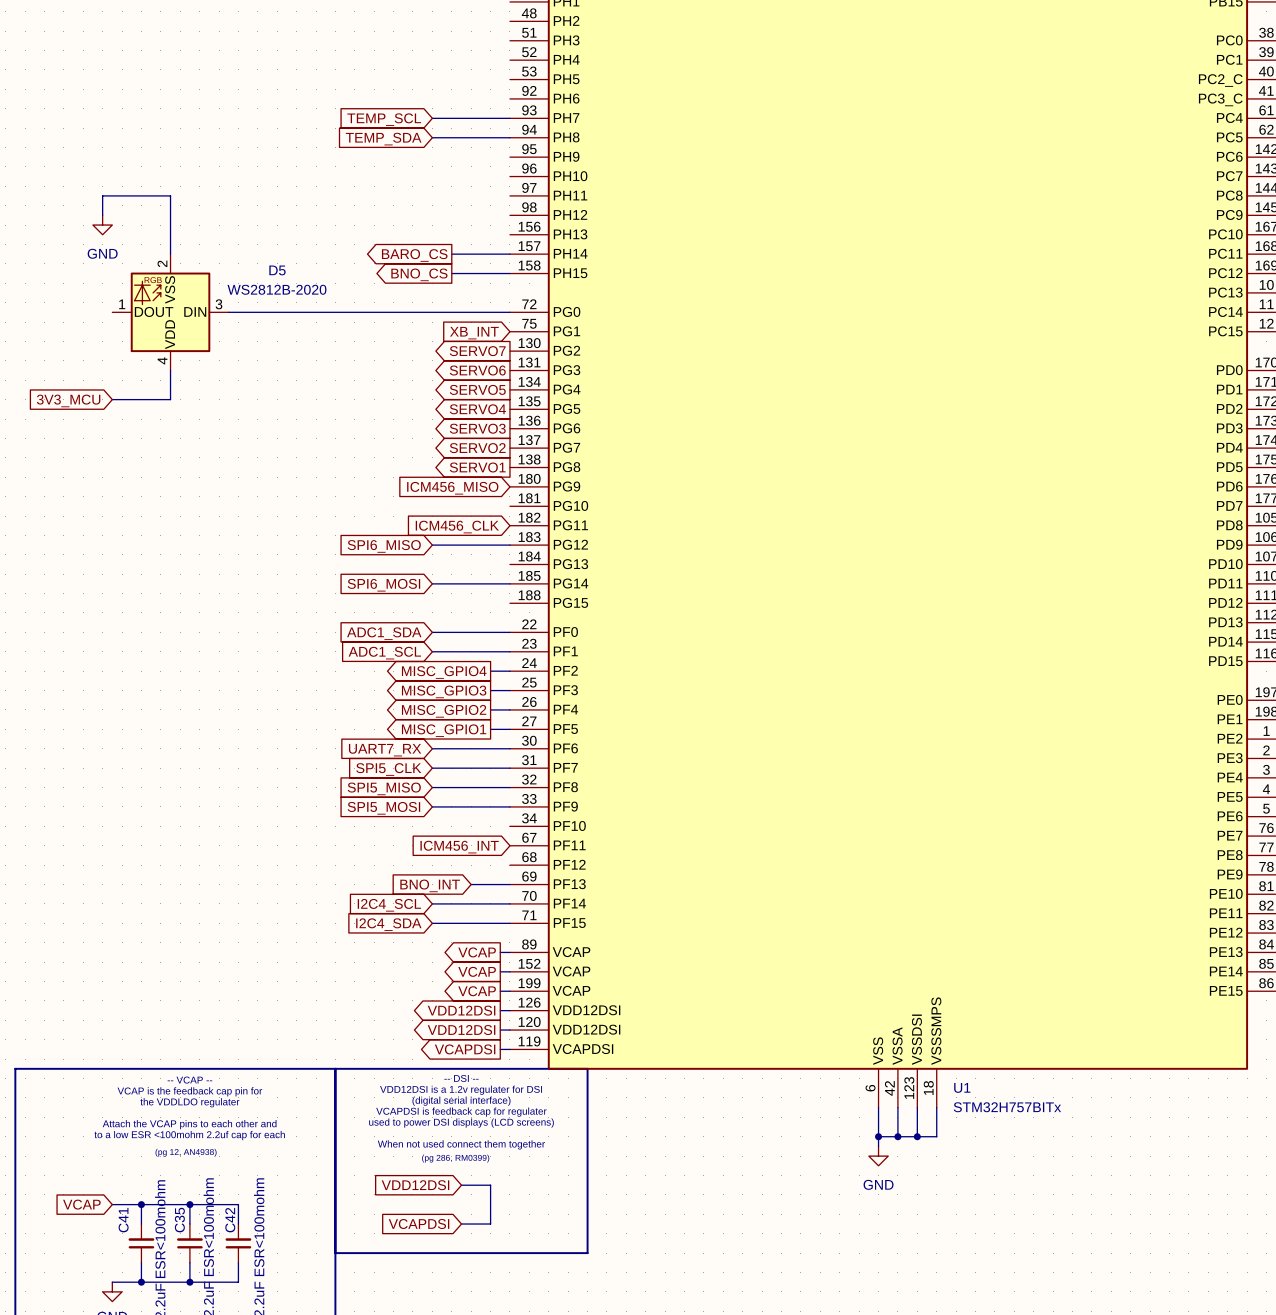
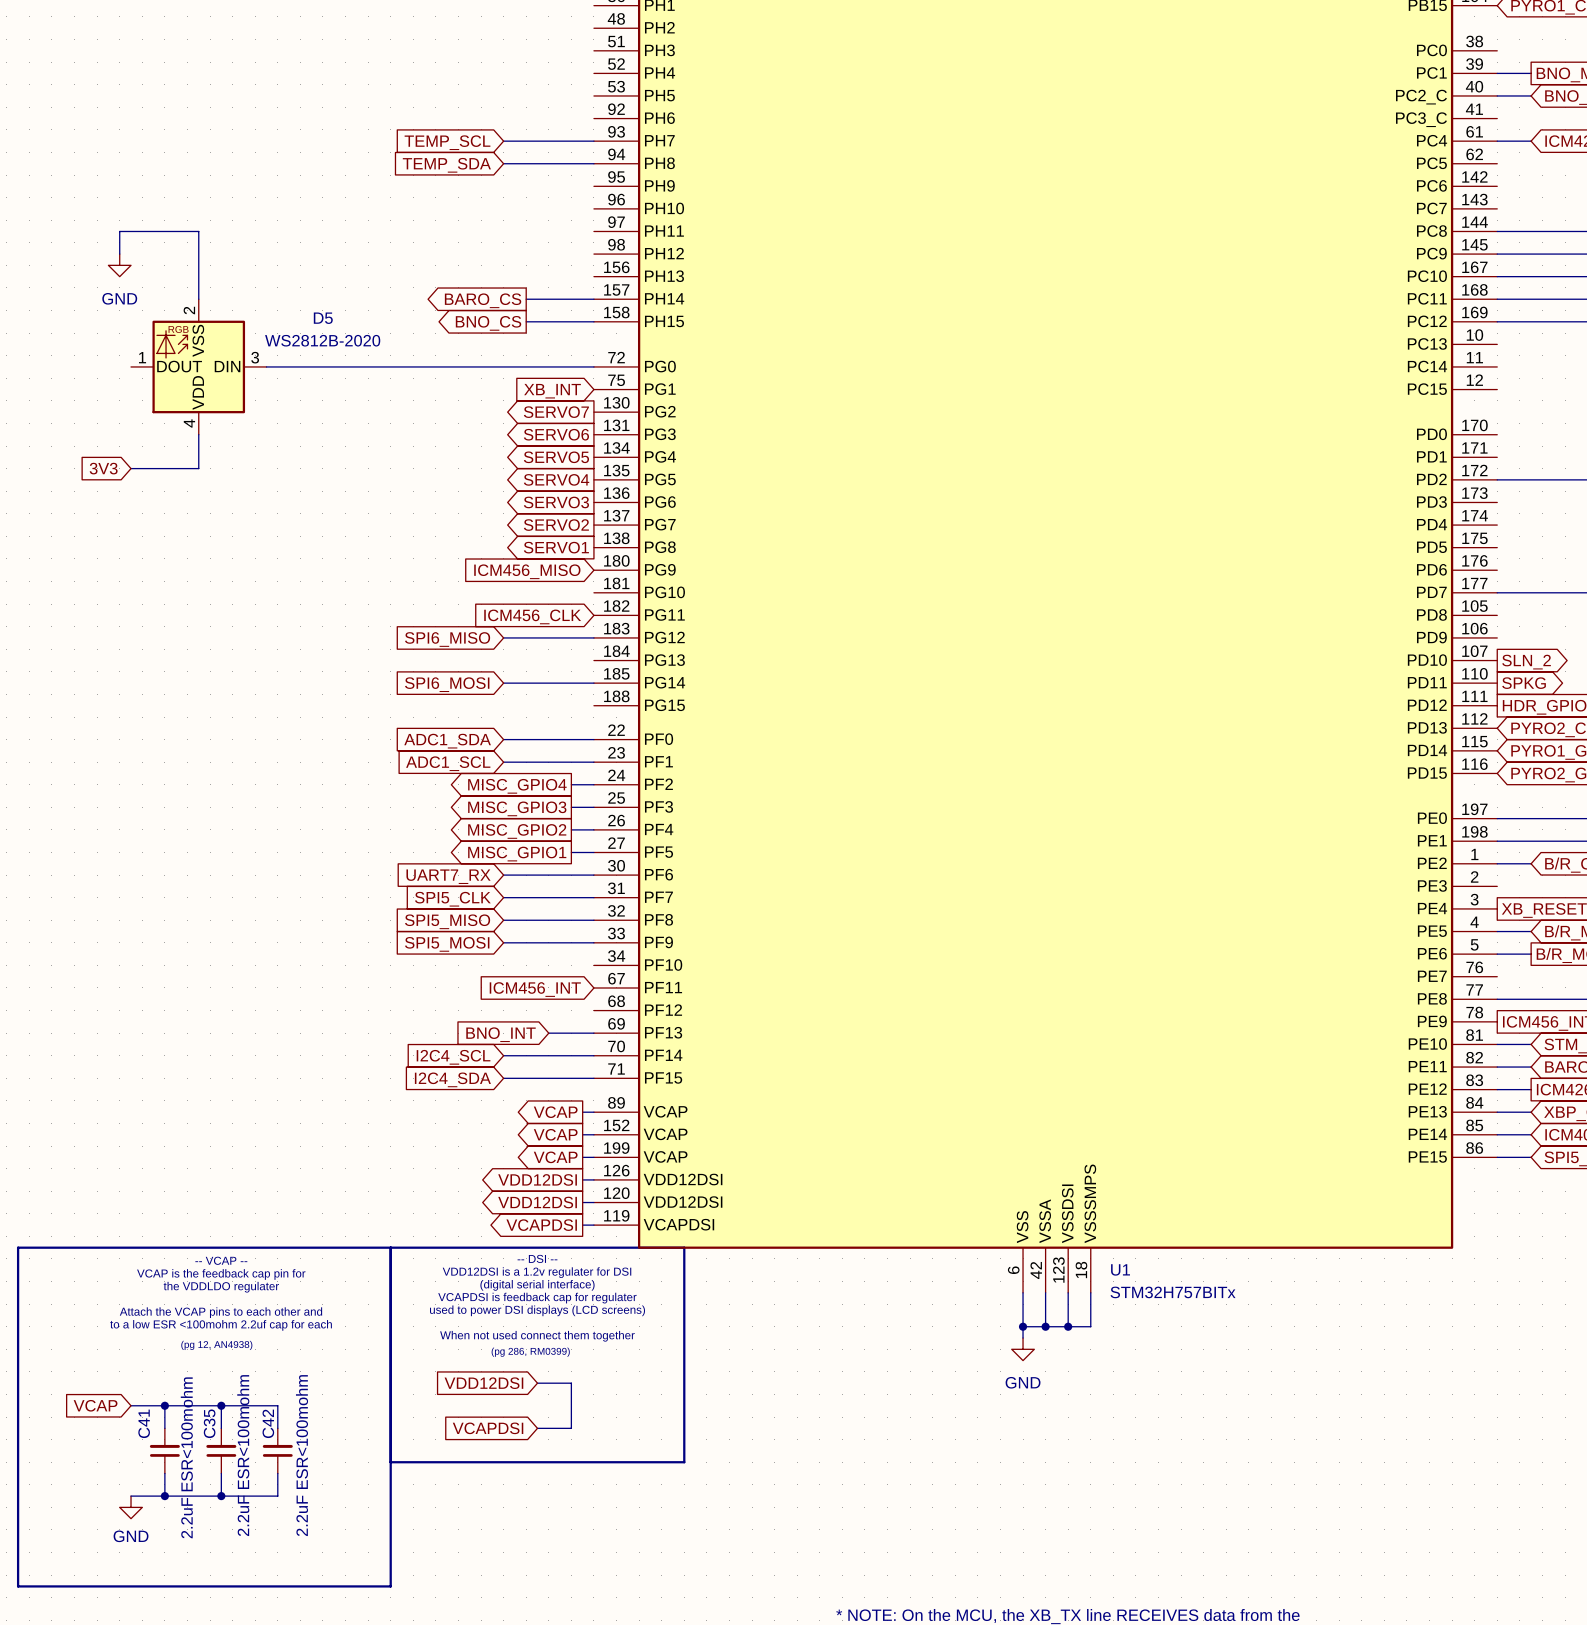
global label: 3V3_MCU (68, 400) -> 3V3 (103, 468)

